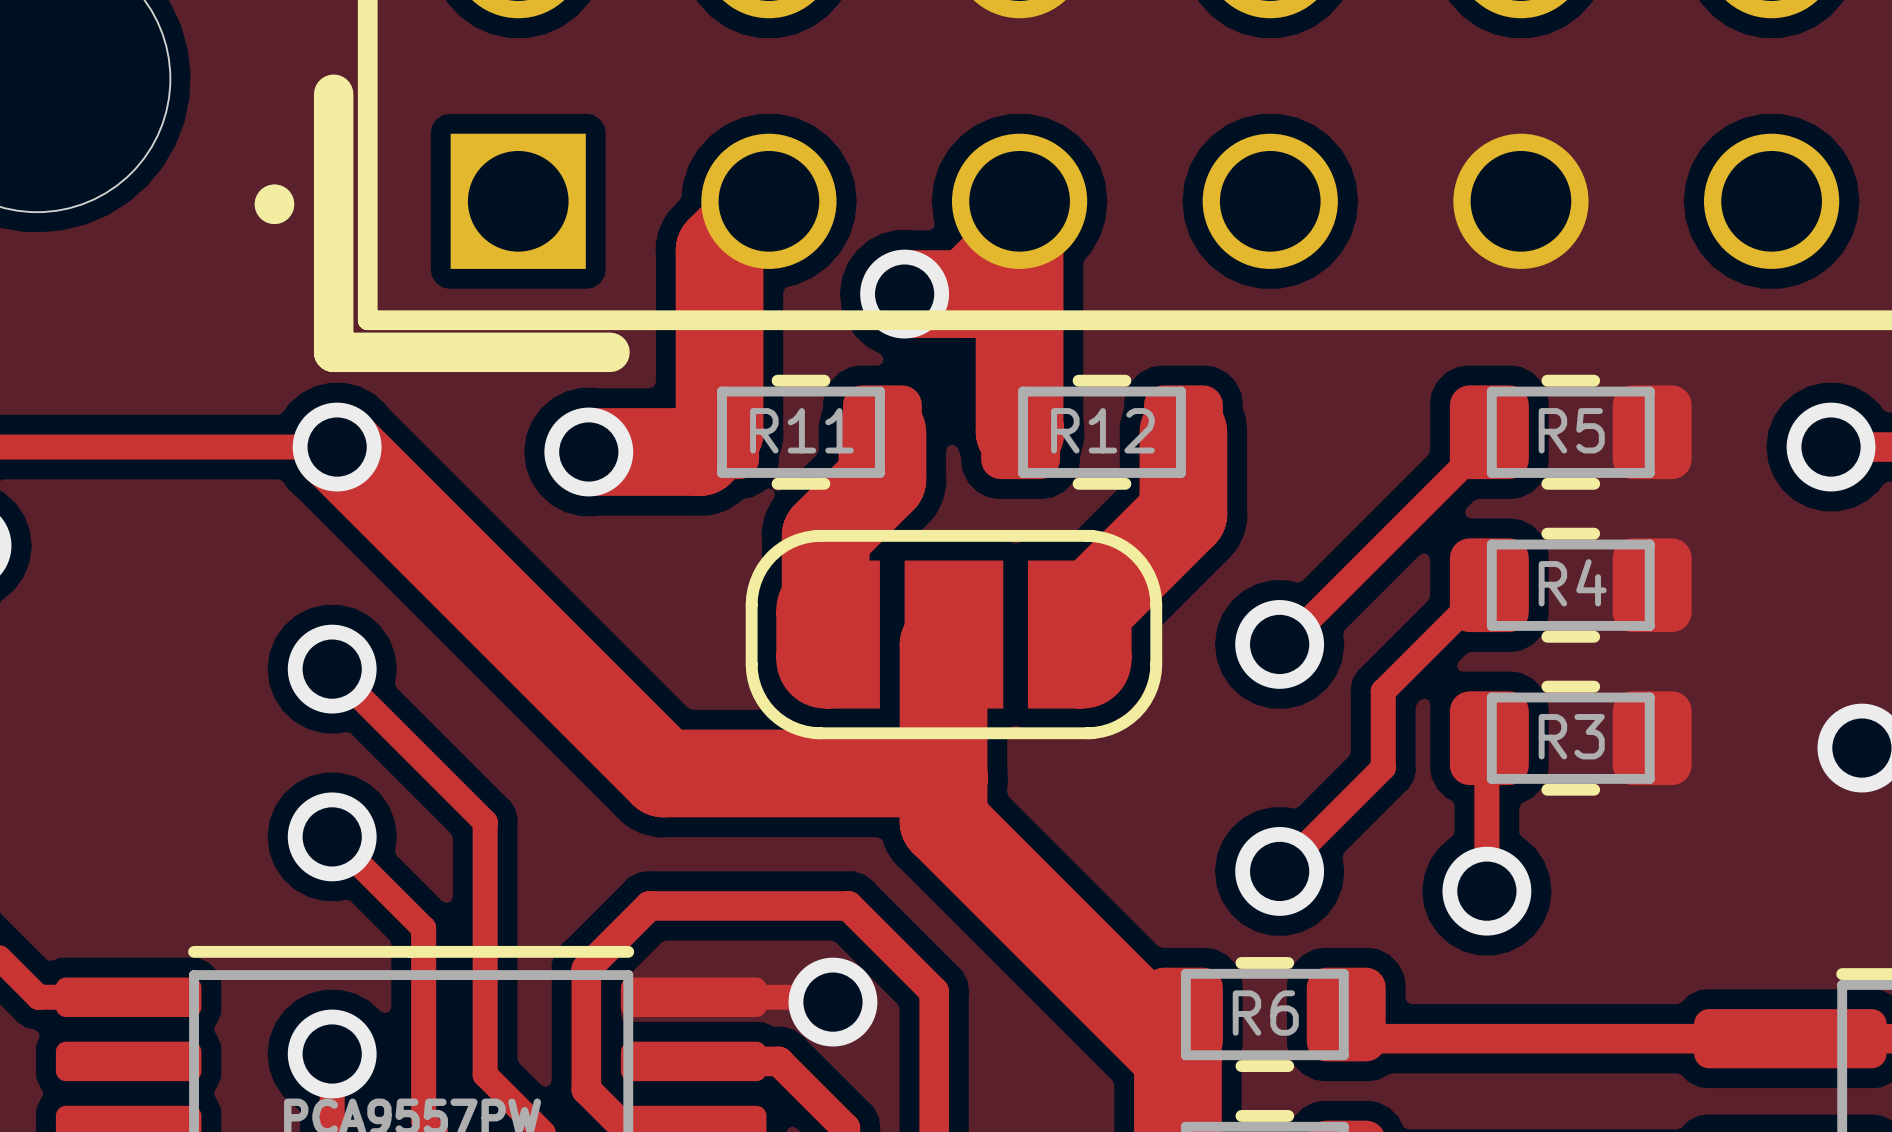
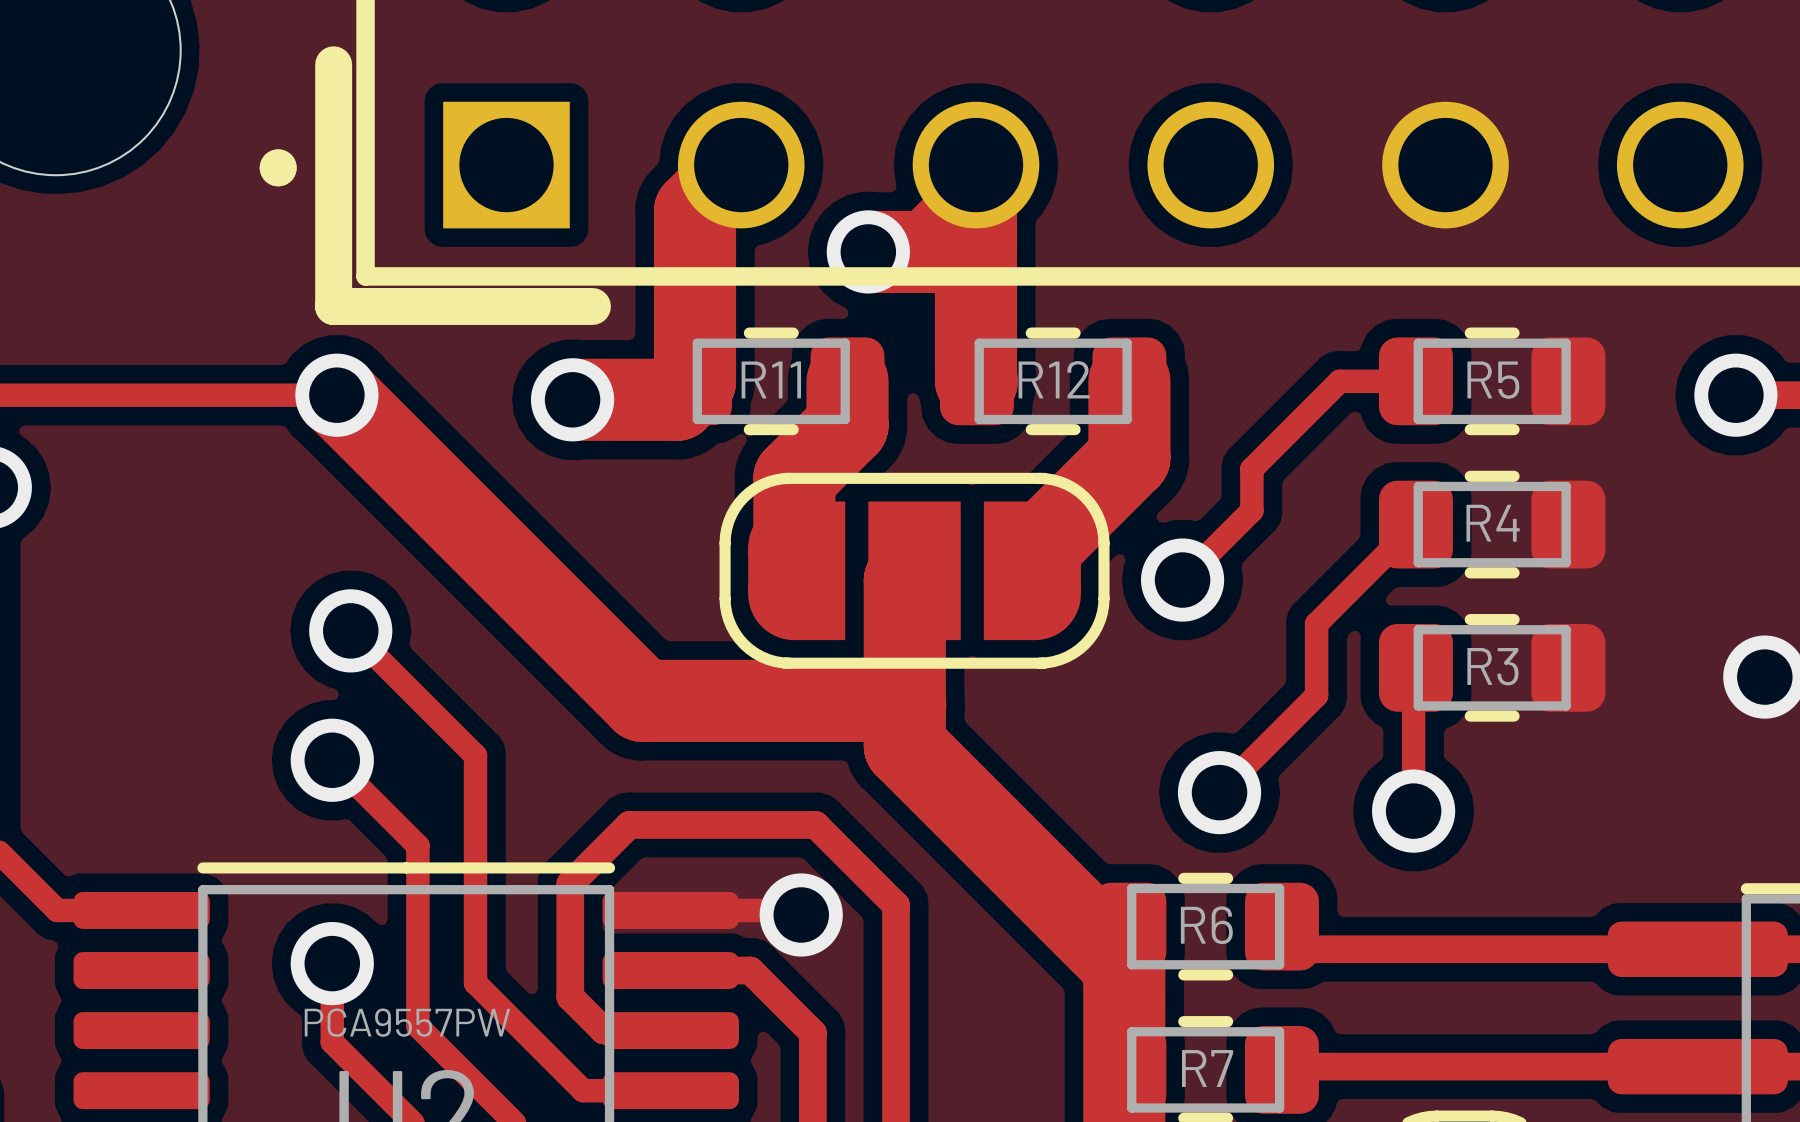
track: (1489, 432) (1489, 439) (1284, 644) (1279, 644) -> (1415, 381) (1339, 381) (1251, 469) (1251, 510) (1182, 580)
via position: (1279, 644) -> (1182, 580)
track: (332, 669) (485, 822) (485, 831) -> (350, 630) (475, 755)
via position: (332, 669) -> (350, 630)

